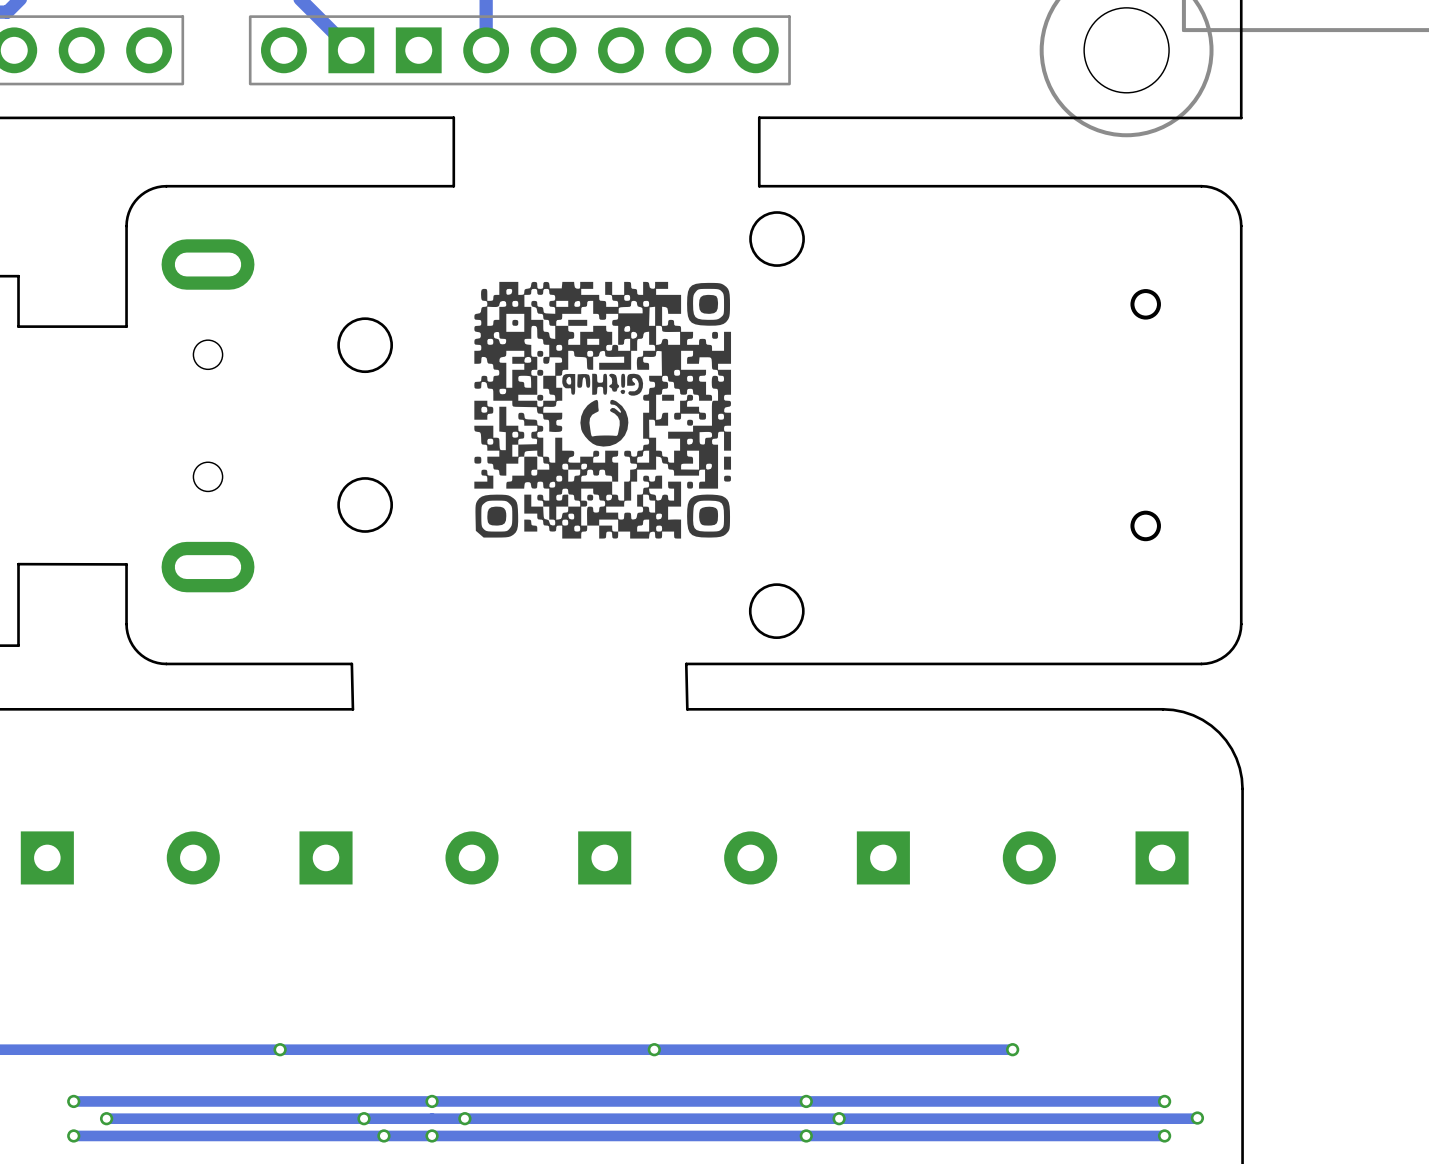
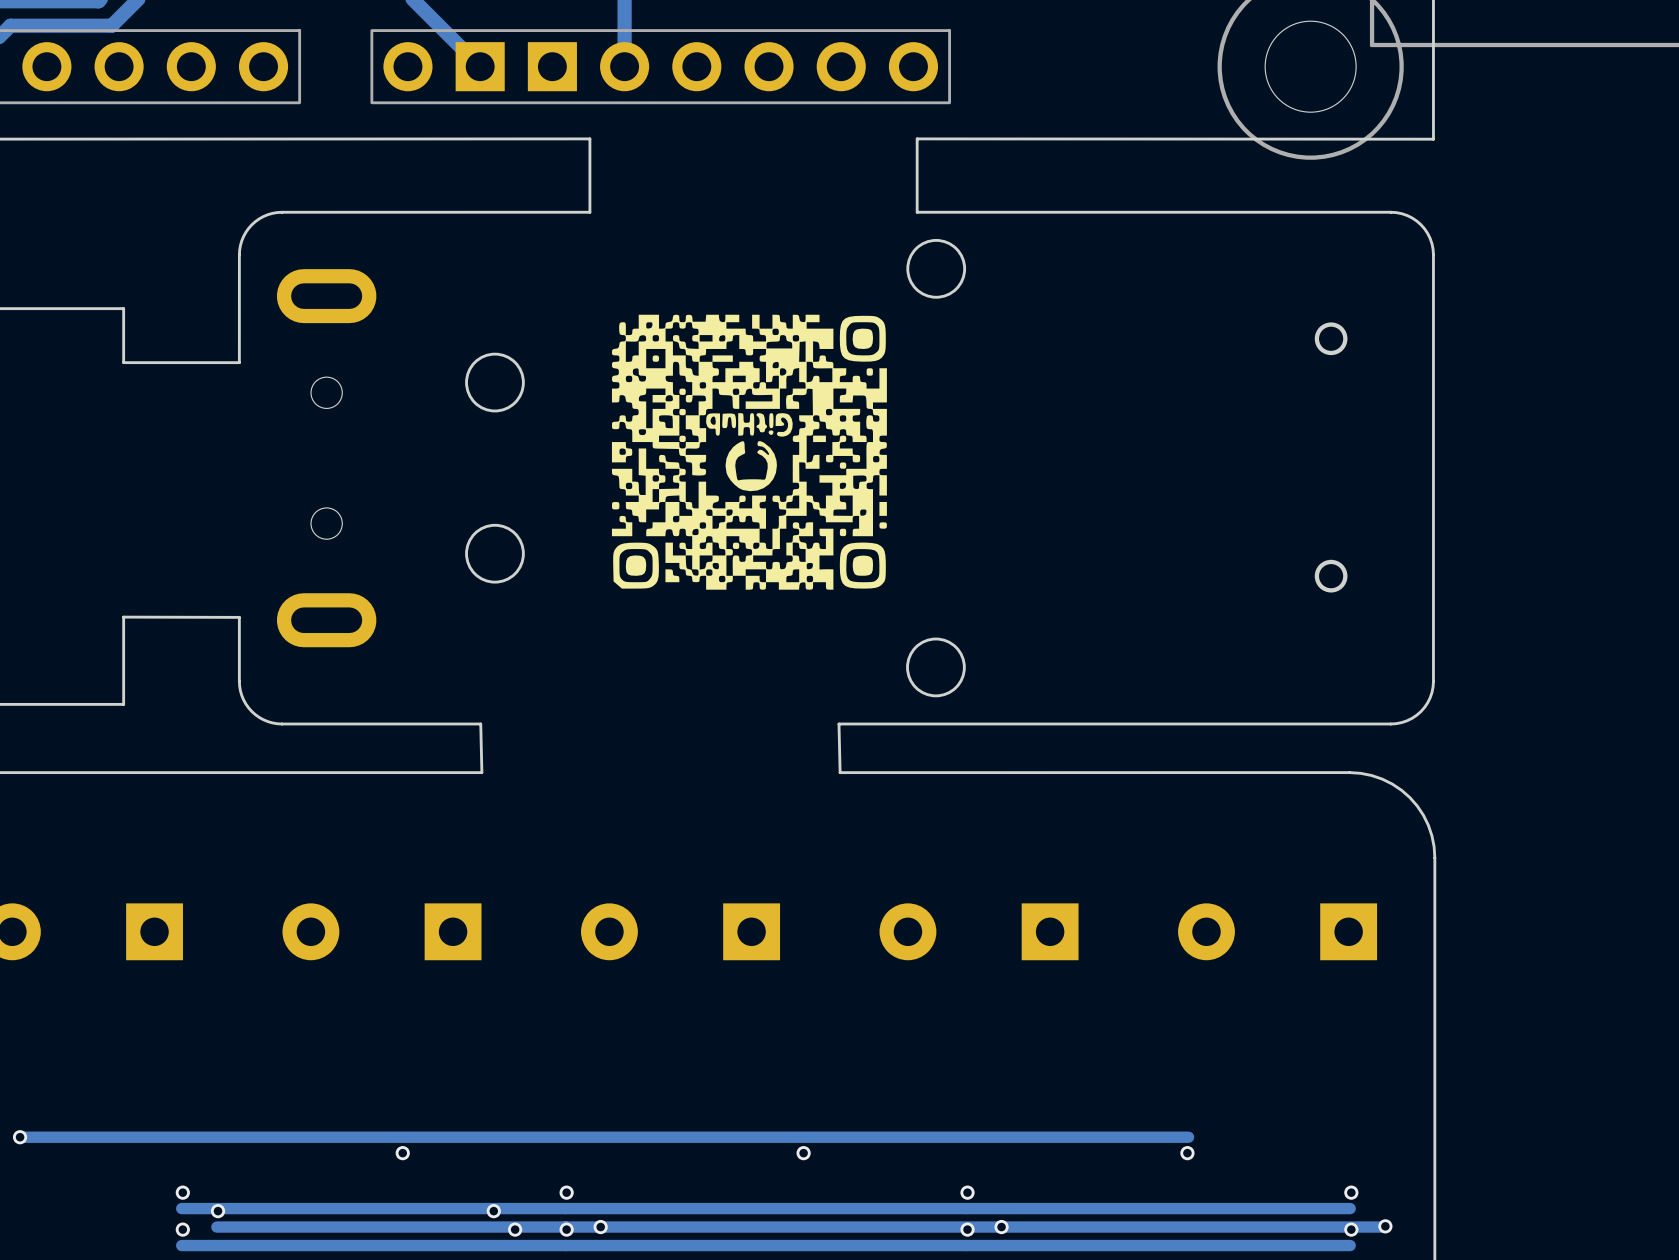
via position: (280, 1049) -> (402, 1153)
via position: (654, 1049) -> (803, 1153)
via position: (1012, 1049) -> (1187, 1153)
track: (1164, 1101) (73, 1101) -> (1350, 1208) (181, 1208)
via position: (464, 1118) -> (600, 1227)
via position: (839, 1118) -> (1001, 1227)
track: (1197, 1118) (106, 1118) -> (1385, 1226) (216, 1227)
via position: (1197, 1118) -> (1385, 1226)
track: (1164, 1135) (73, 1135) -> (1350, 1245) (181, 1245)

